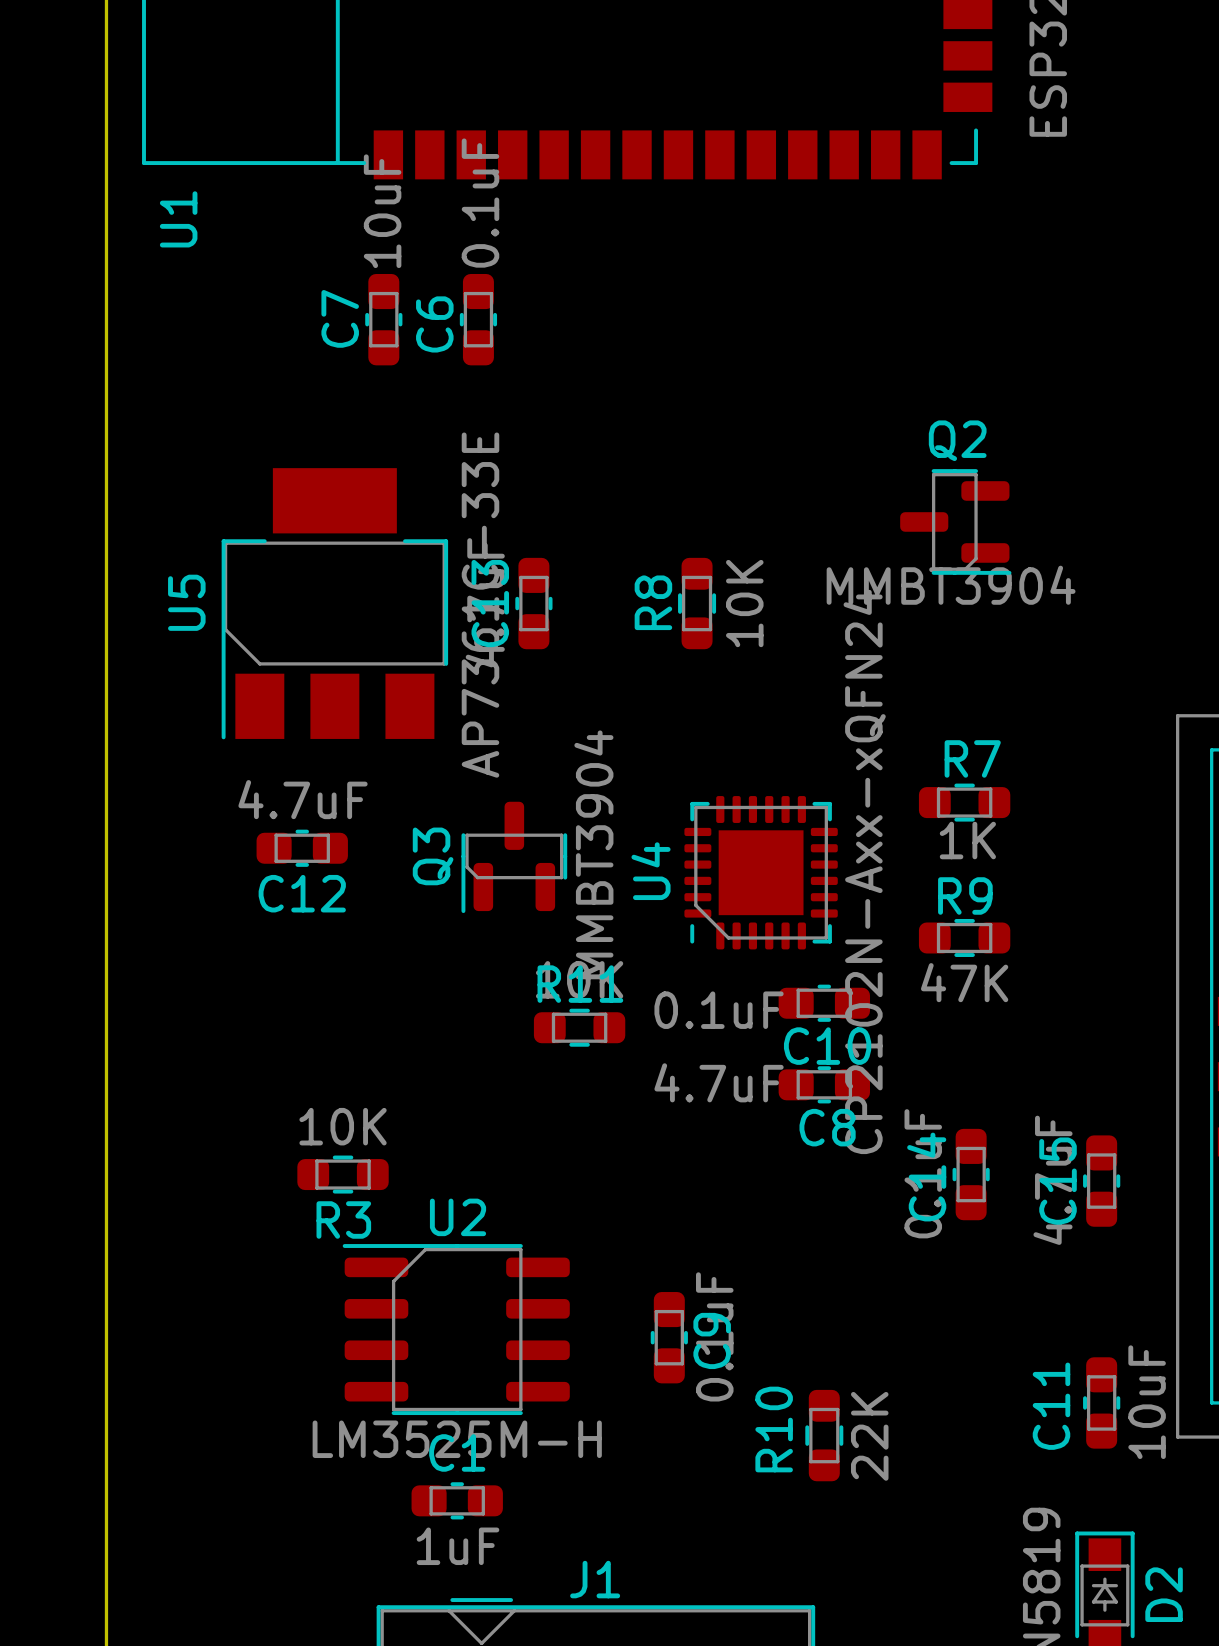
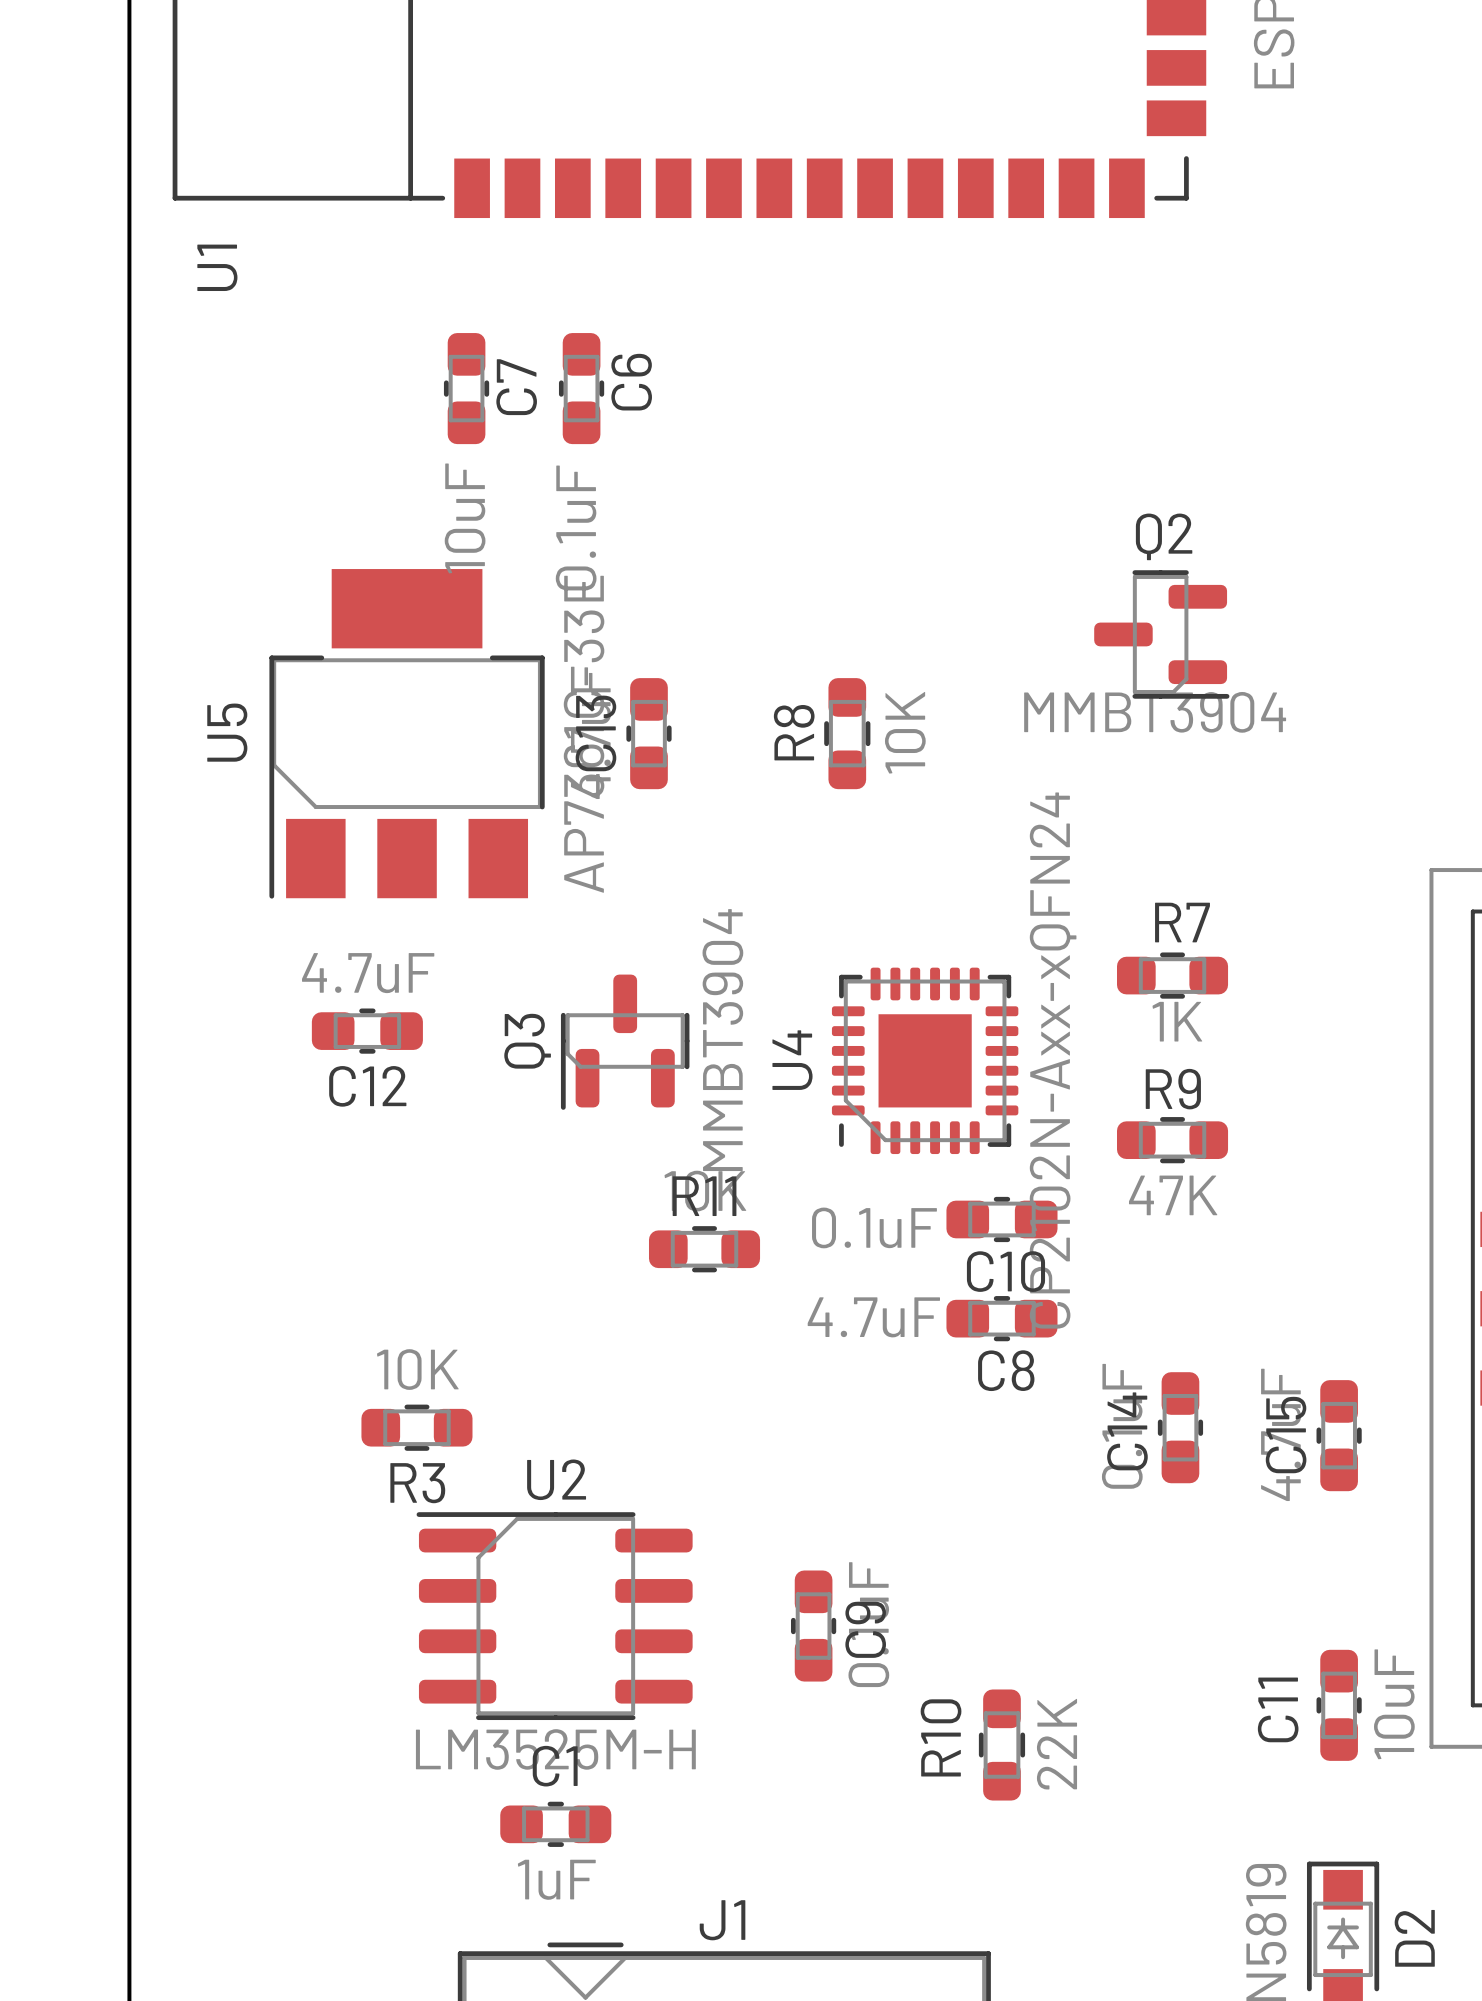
C6 value position: 0.1uF (480, 203) -> 0.1uF (576, 527)
C7 value position: 10uF (382, 211) -> 10uF (465, 518)
C7 name position: C7 (340, 318) -> C7 (516, 387)
C6 name position: C6 (434, 324) -> C6 (631, 382)
U4 footprint: [684, 796, 838, 950] -> [831, 967, 1019, 1155]

